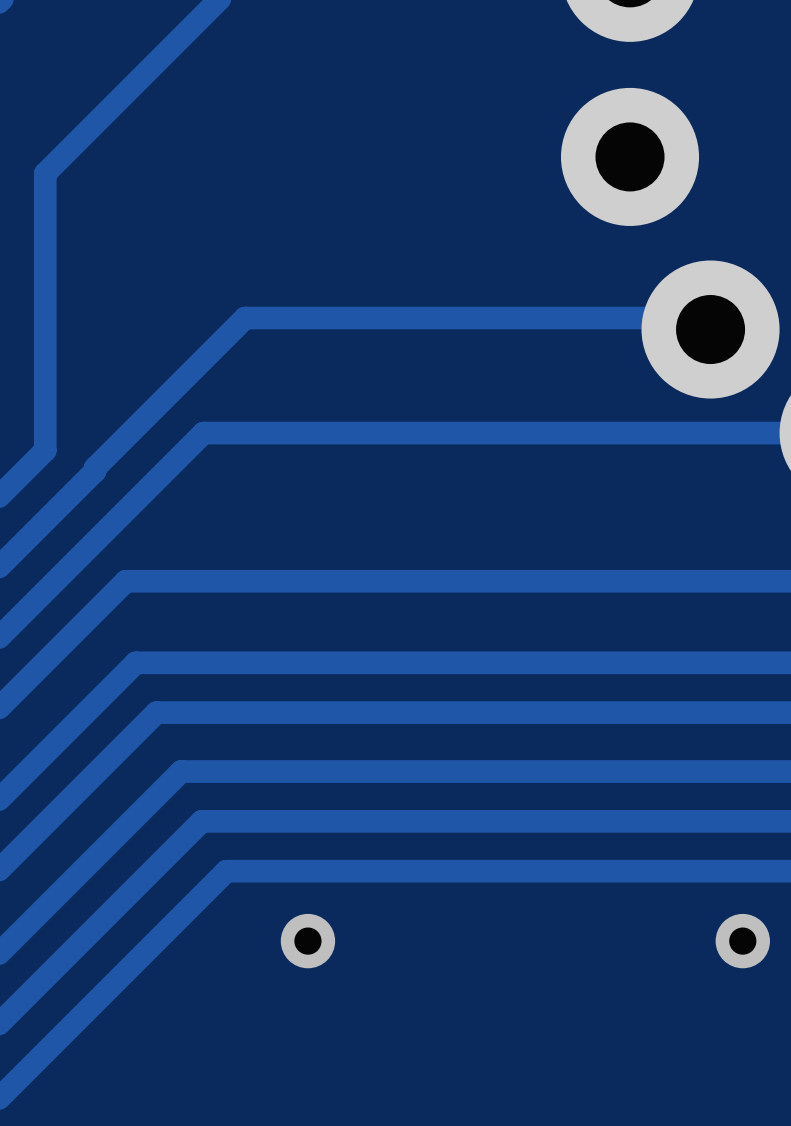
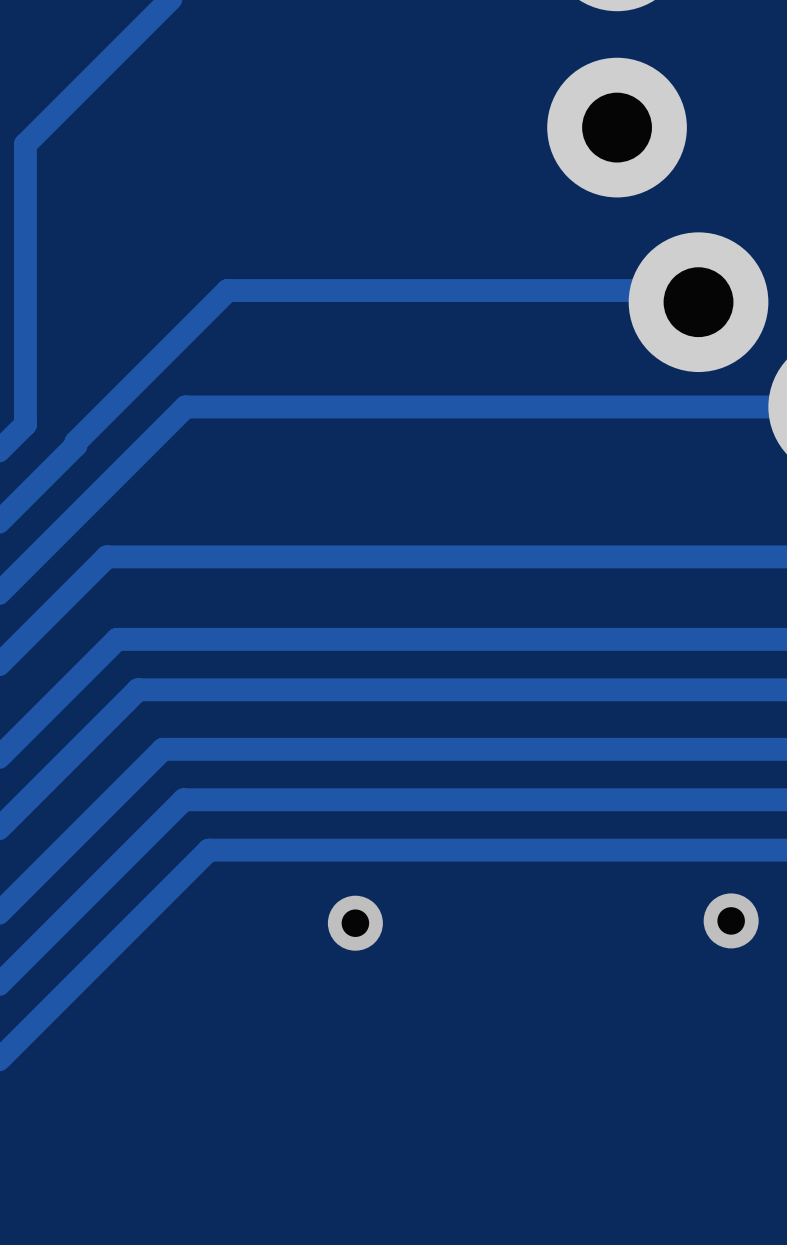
via position: (307, 941) -> (355, 923)

